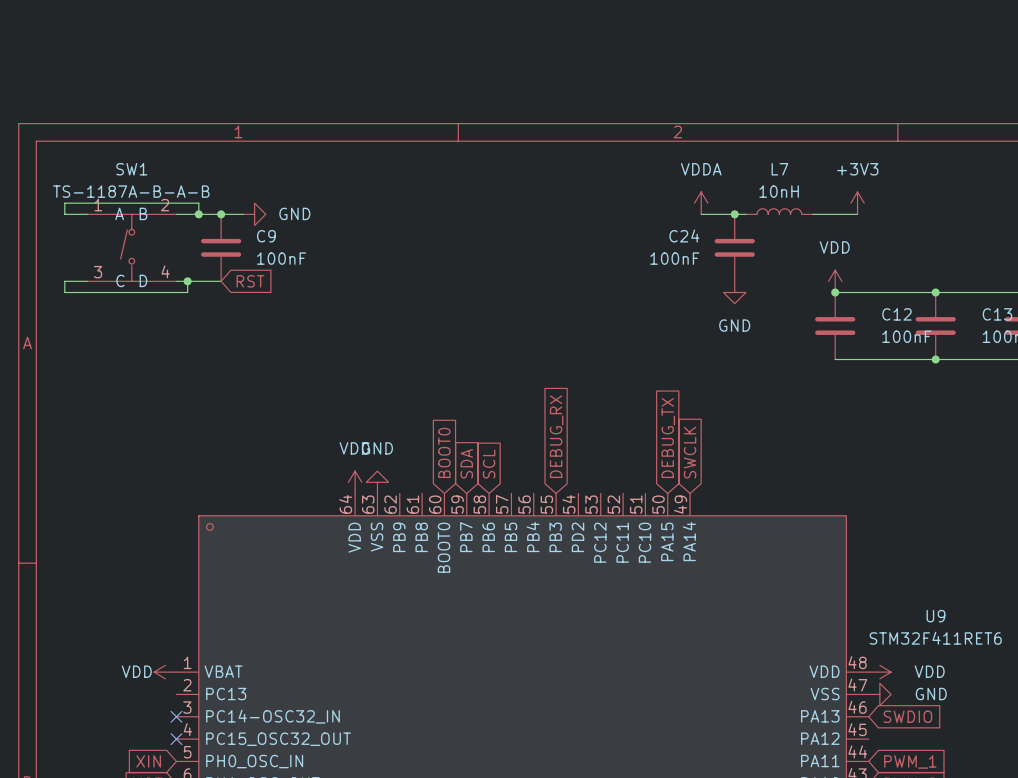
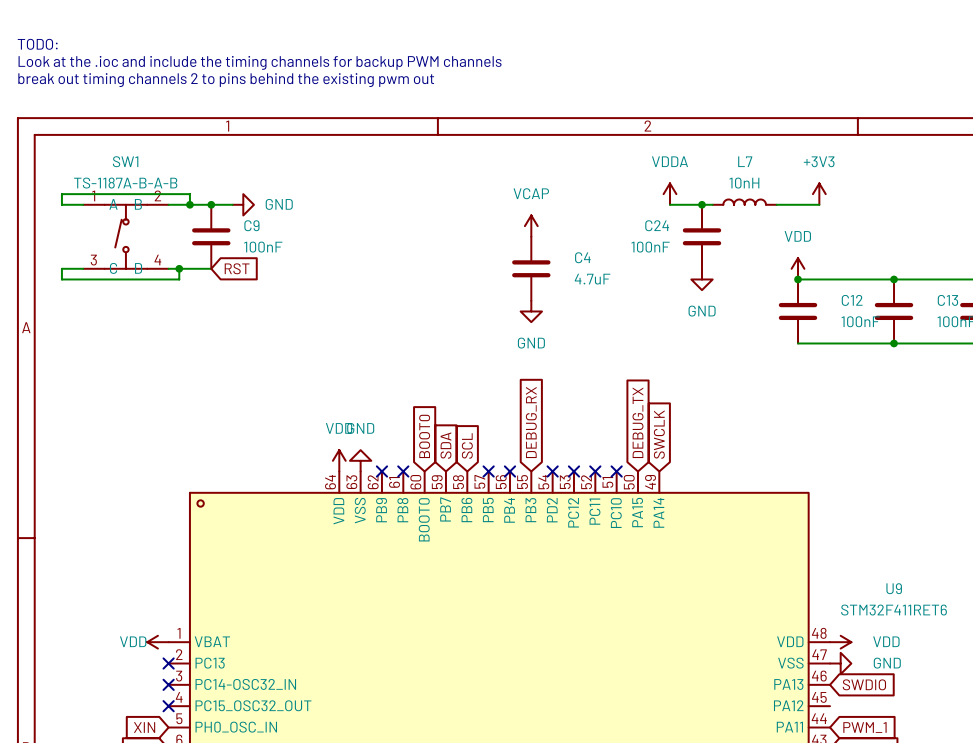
text: none -> TODO: (37, 44)
text: none -> Look at the .ioc and include the timing channels for backup PWM channels (260, 62)
text: none -> break out timing channels 2 to pins behind the existing pwm out (226, 80)
power symbol: none -> VCAP (531, 226)
C4: none -> 4.7uF (531, 268)
power symbol: none -> GND (531, 311)
no-connect mark: none -> (381, 471)
no-connect mark: none -> (403, 471)
no-connect mark: none -> (488, 471)
no-connect mark: none -> (509, 471)
no-connect mark: none -> (552, 471)
no-connect mark: none -> (573, 471)
no-connect mark: none -> (595, 471)
no-connect mark: none -> (616, 471)
no-connect mark: none -> (168, 663)

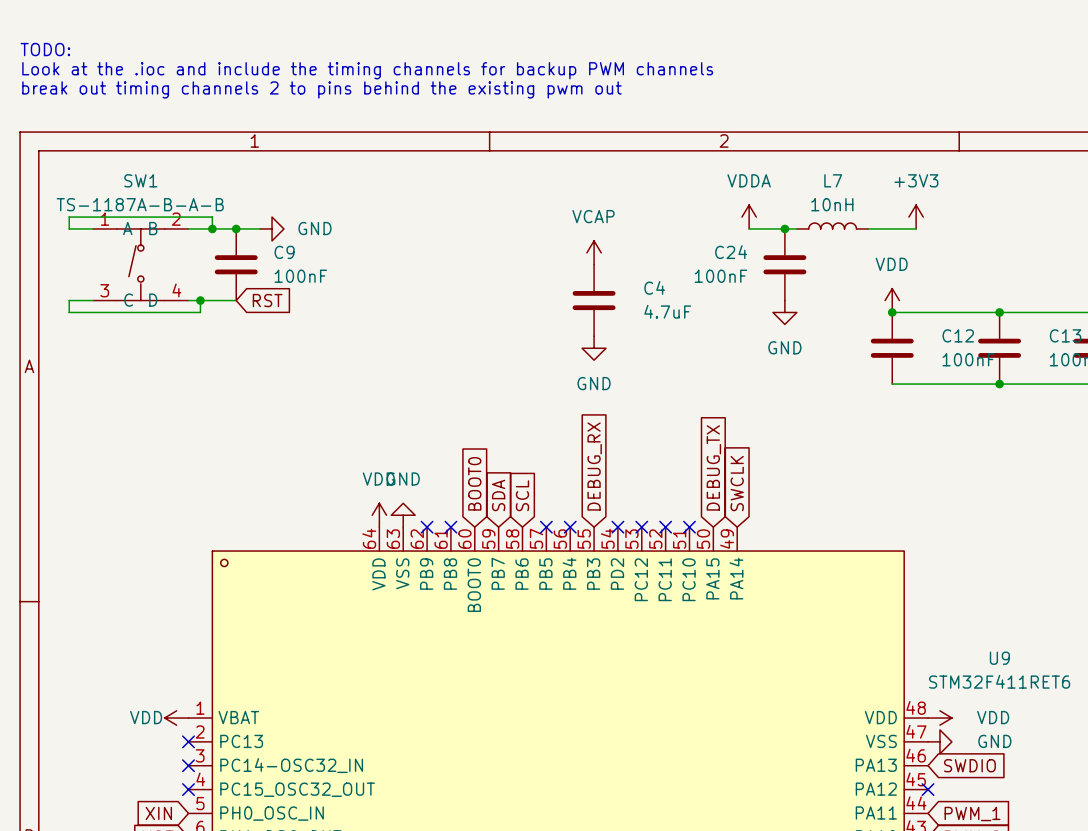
no-connect mark: none -> (928, 789)

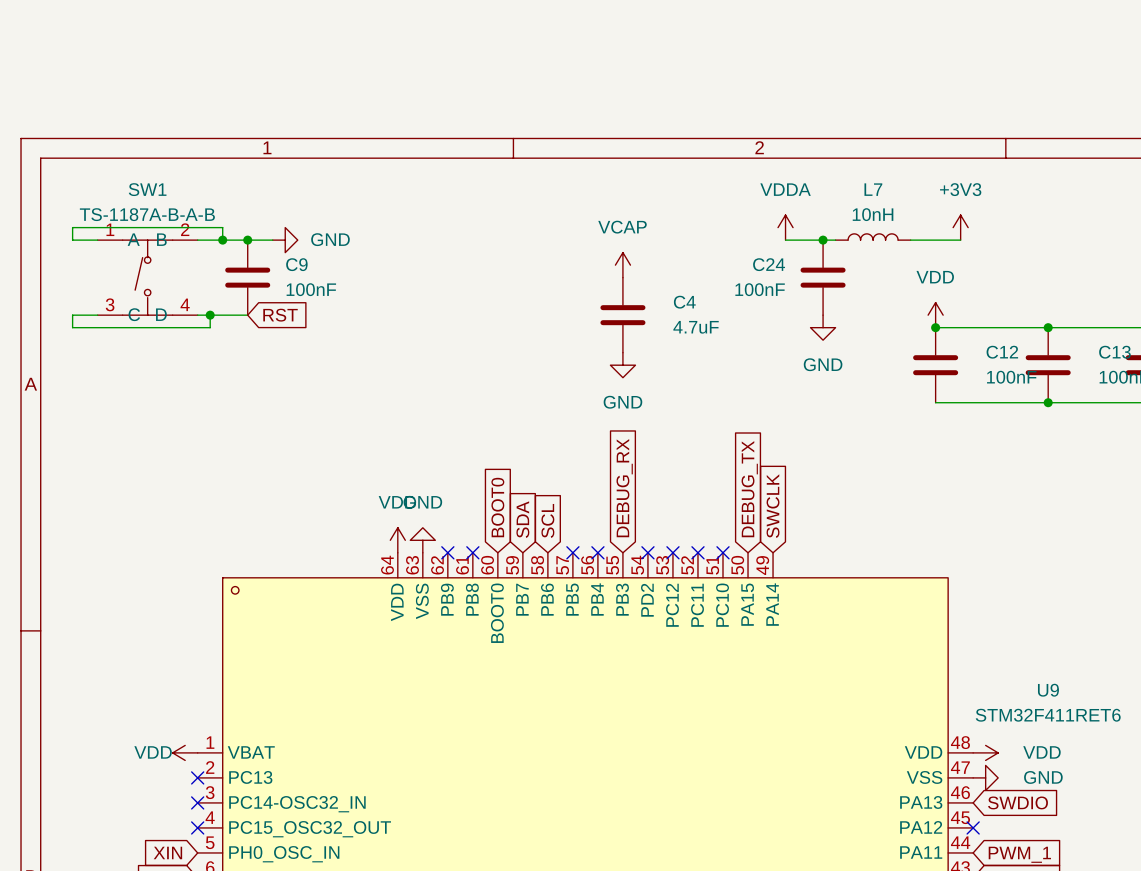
text: TODO: (45, 49) -> none
text: Look at the .ioc and include the timing channels for backup PWM channels (367, 70) -> none
text: break out timing channels 2 to pins behind the existing pwm out (321, 89) -> none

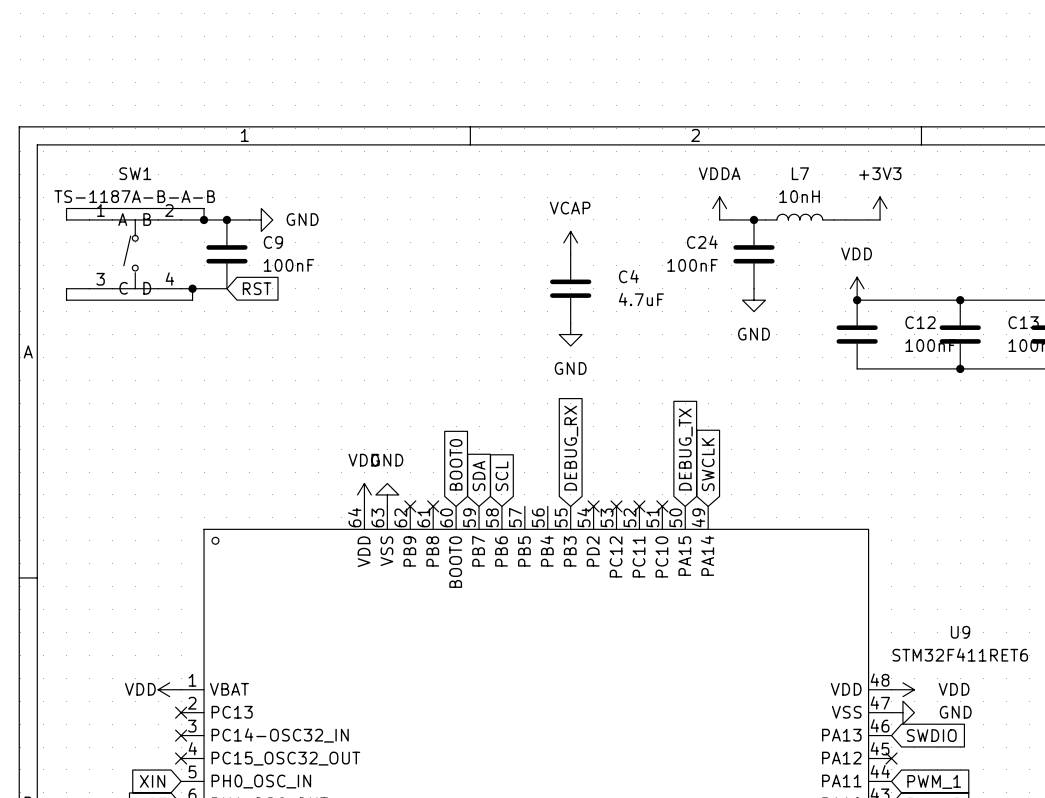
no-connect mark: (572, 552) -> none
no-connect mark: (597, 552) -> none

